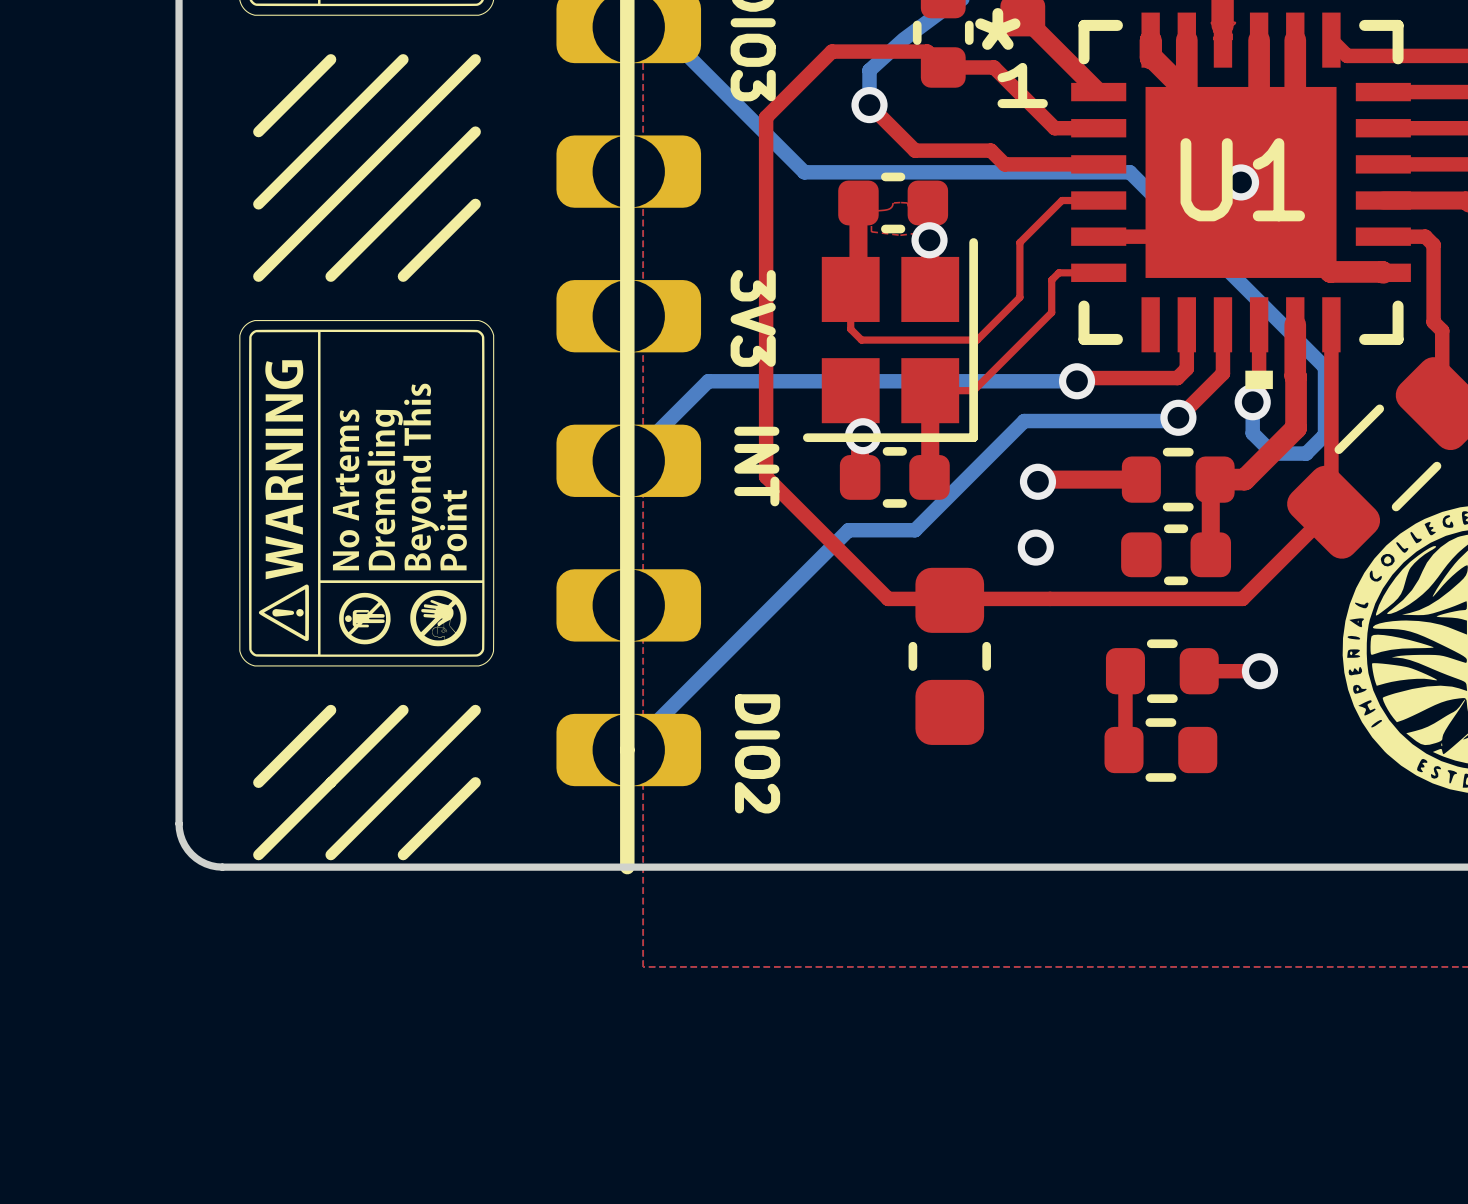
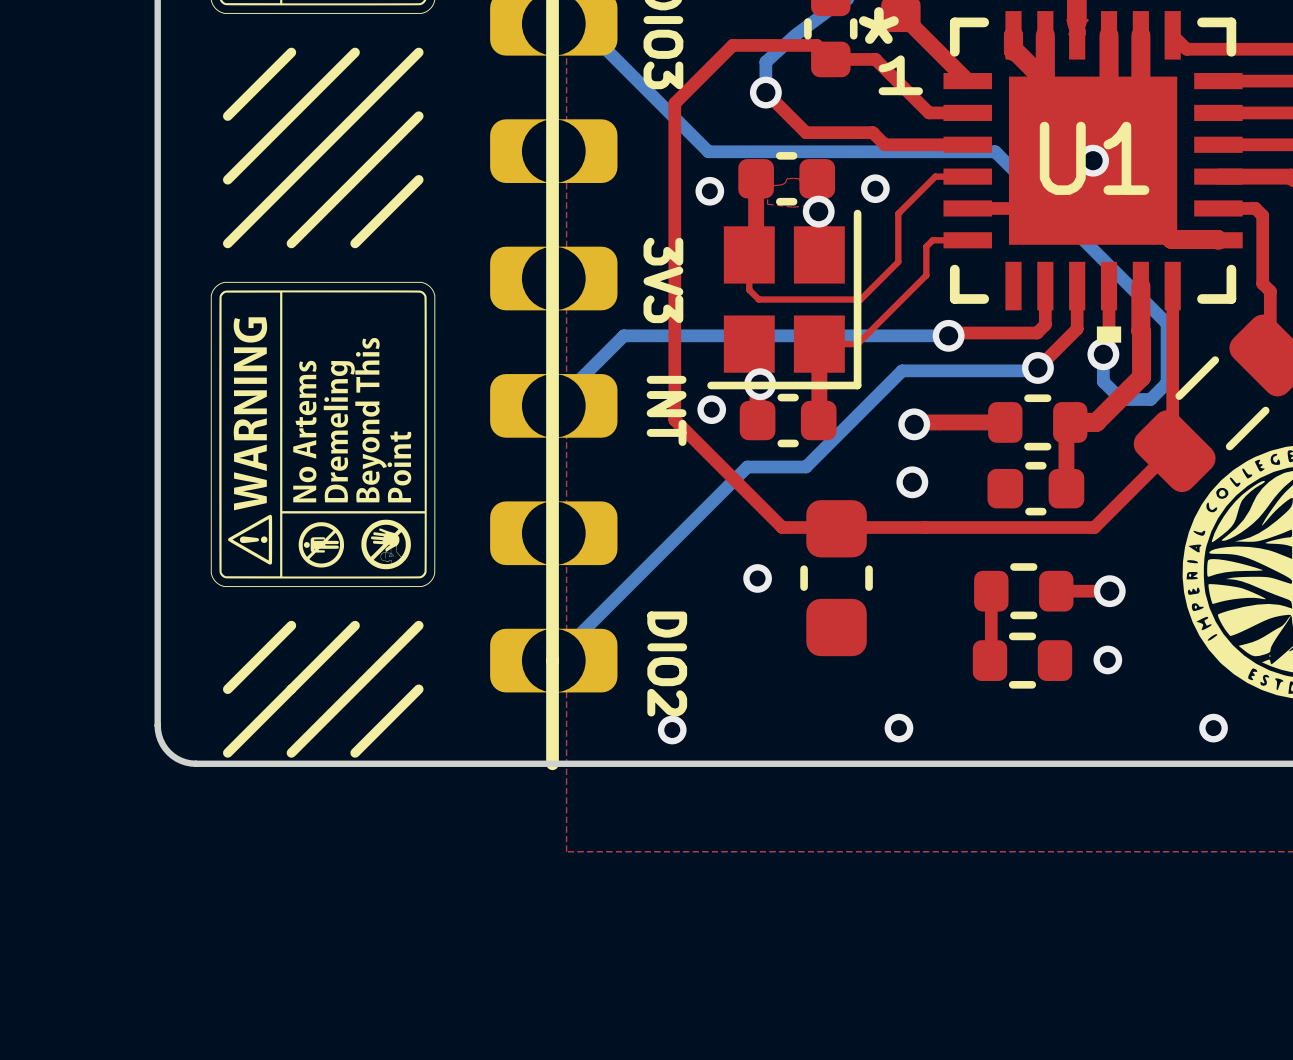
via: none -> (875, 188)
via: none -> (709, 191)
via: none -> (711, 409)
via: none -> (757, 578)
via: none -> (1107, 659)
via: none -> (898, 728)
via: none -> (1213, 728)
via: none -> (672, 730)

